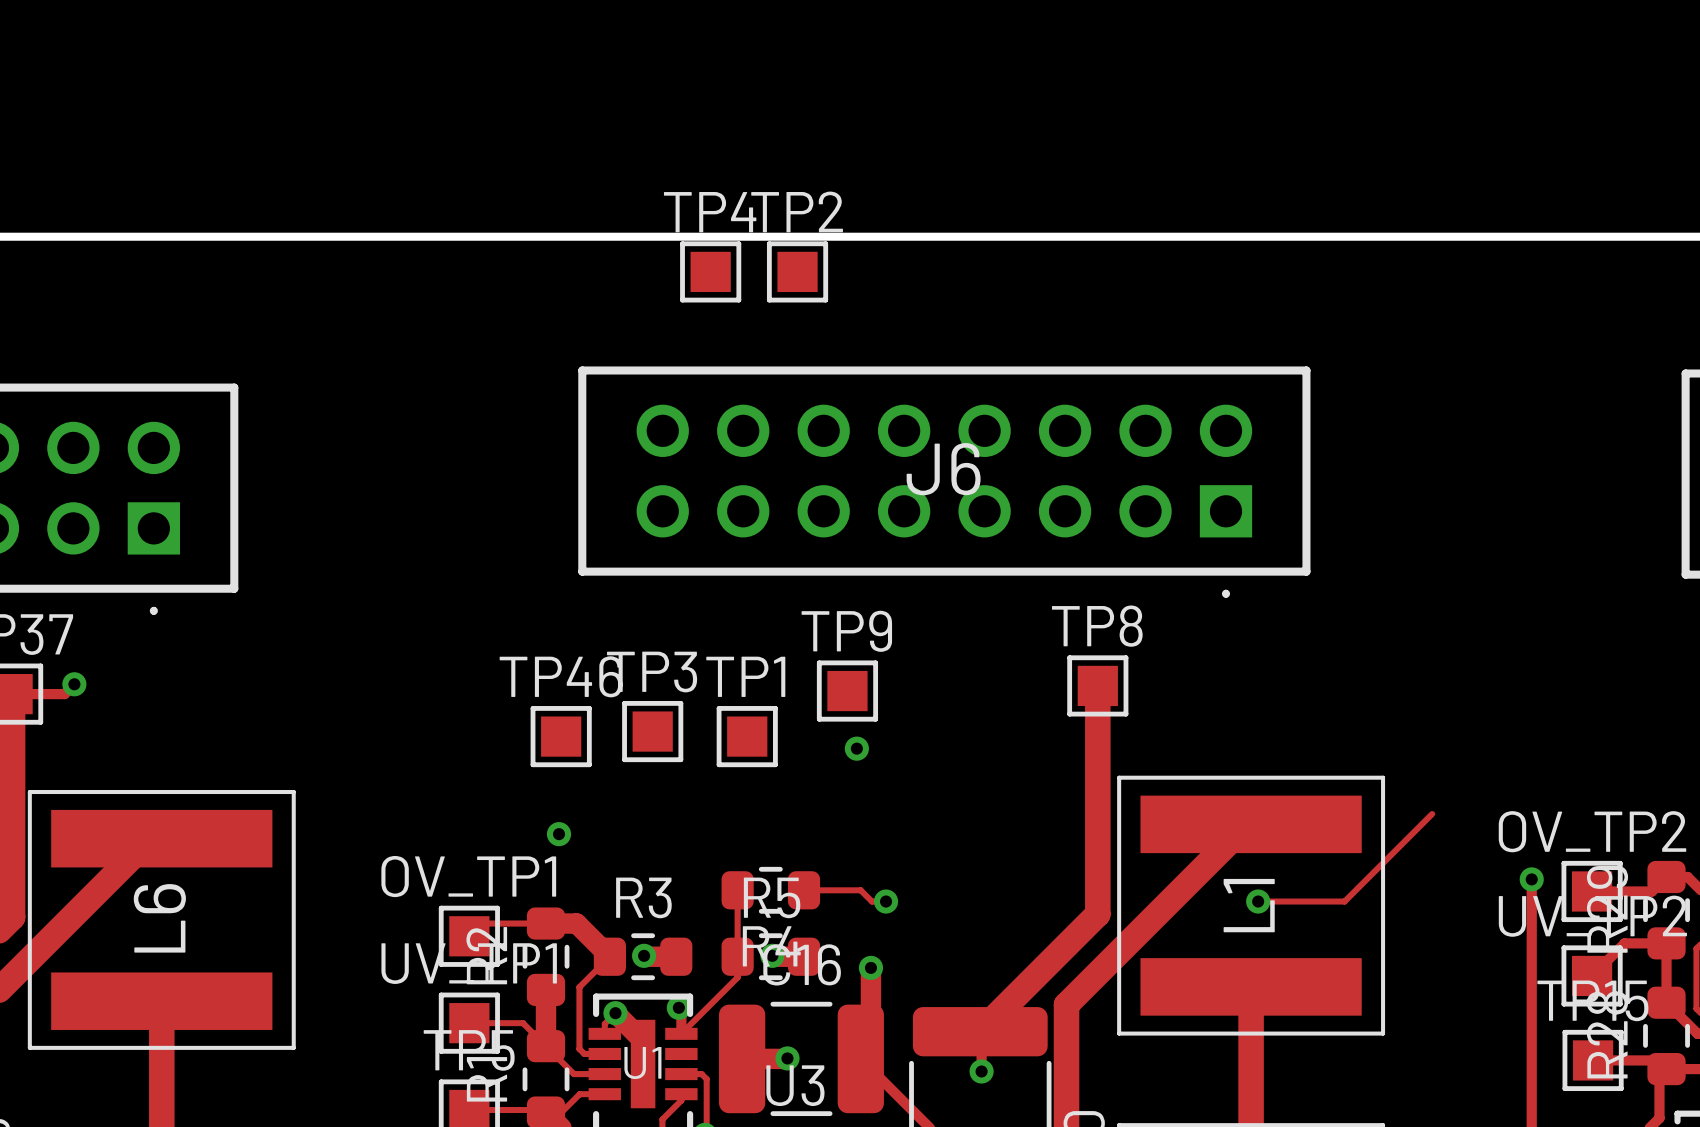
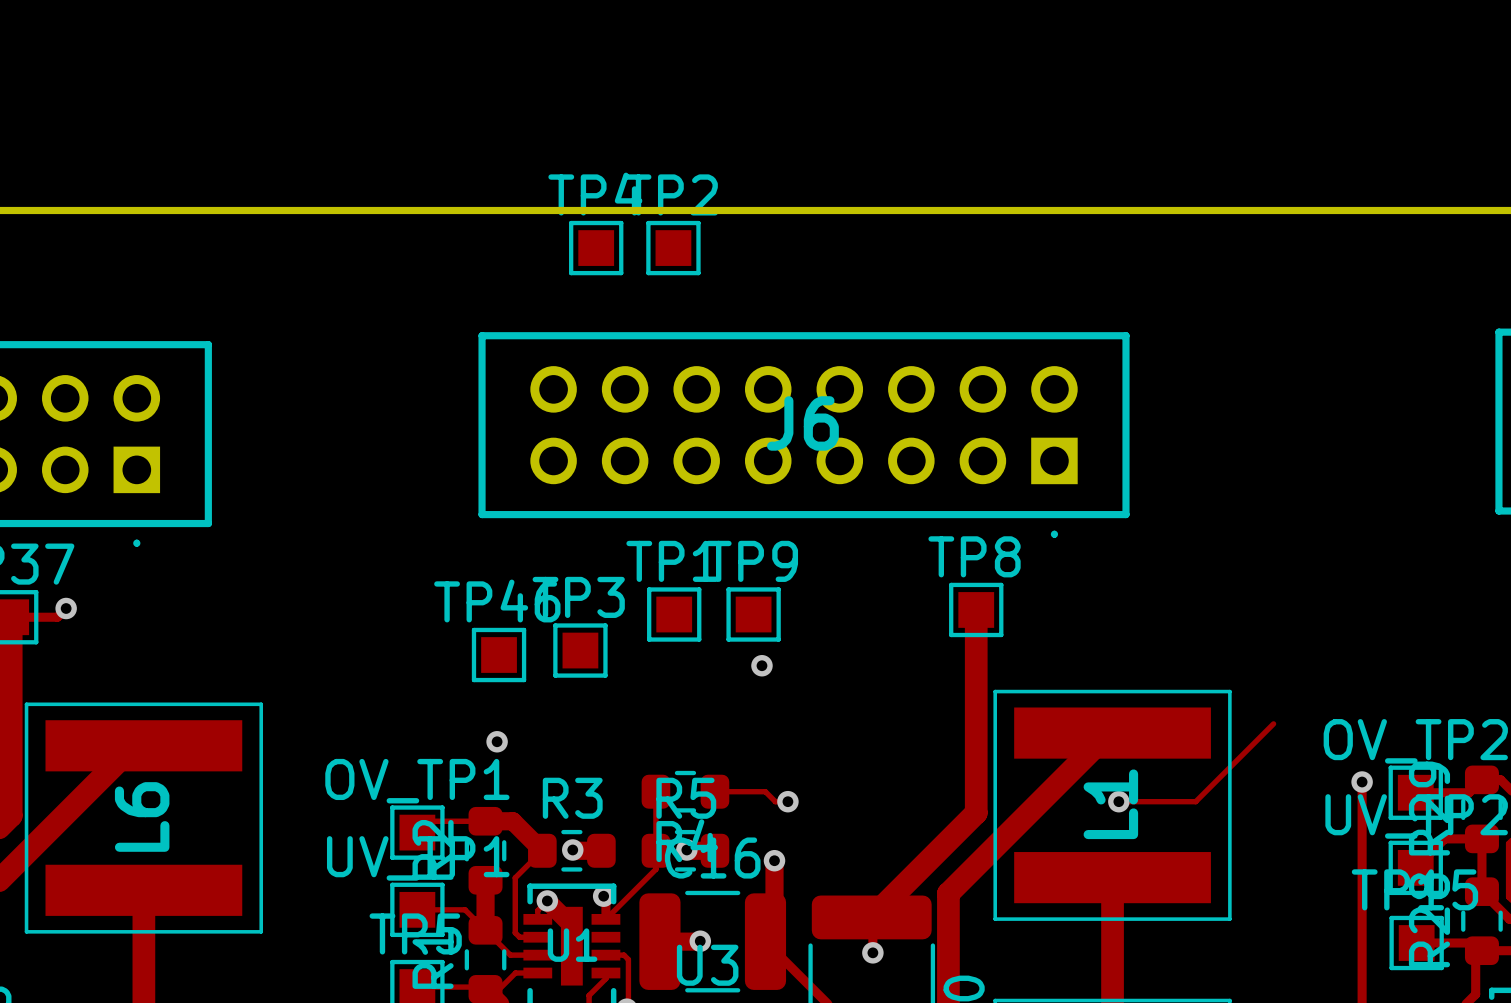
TP4 position: (710, 271) -> (596, 248)
TP2 position: (797, 271) -> (673, 248)
J6 position: (944, 482) -> (804, 434)
TP1 position: (747, 736) -> (674, 614)

